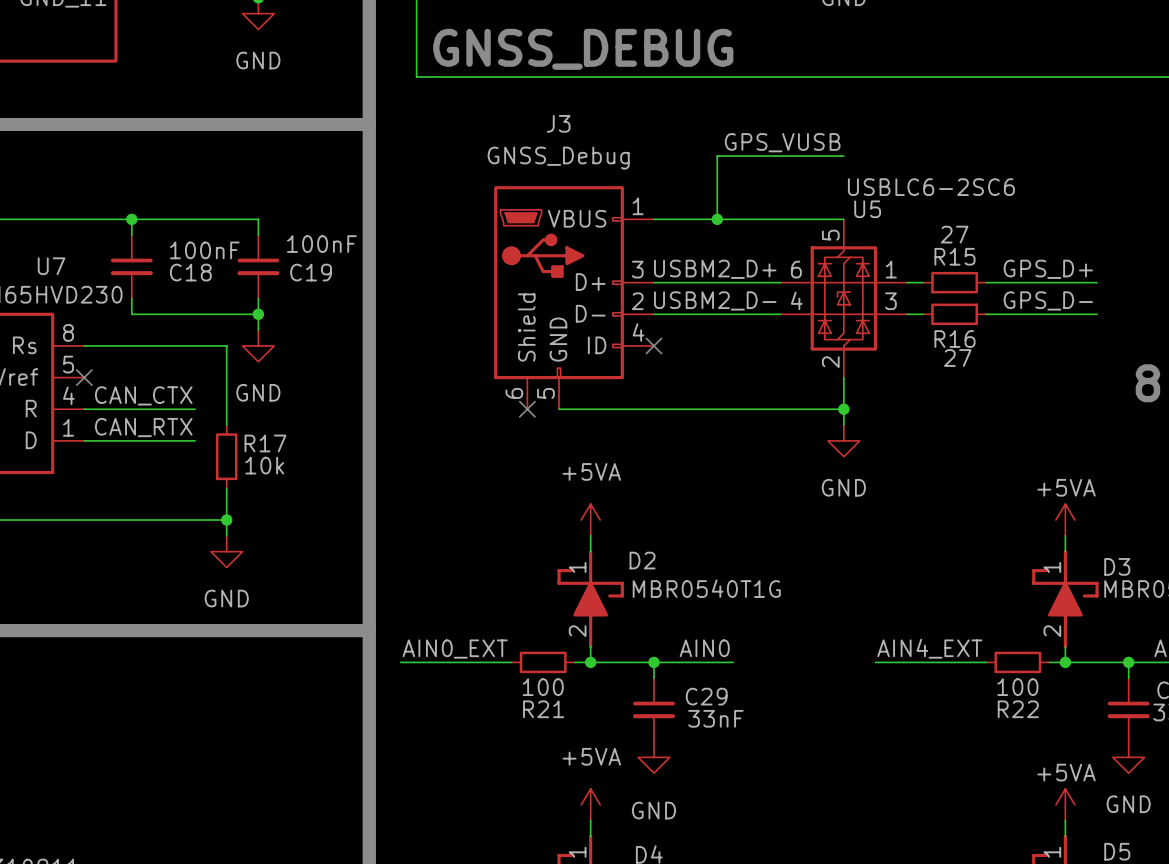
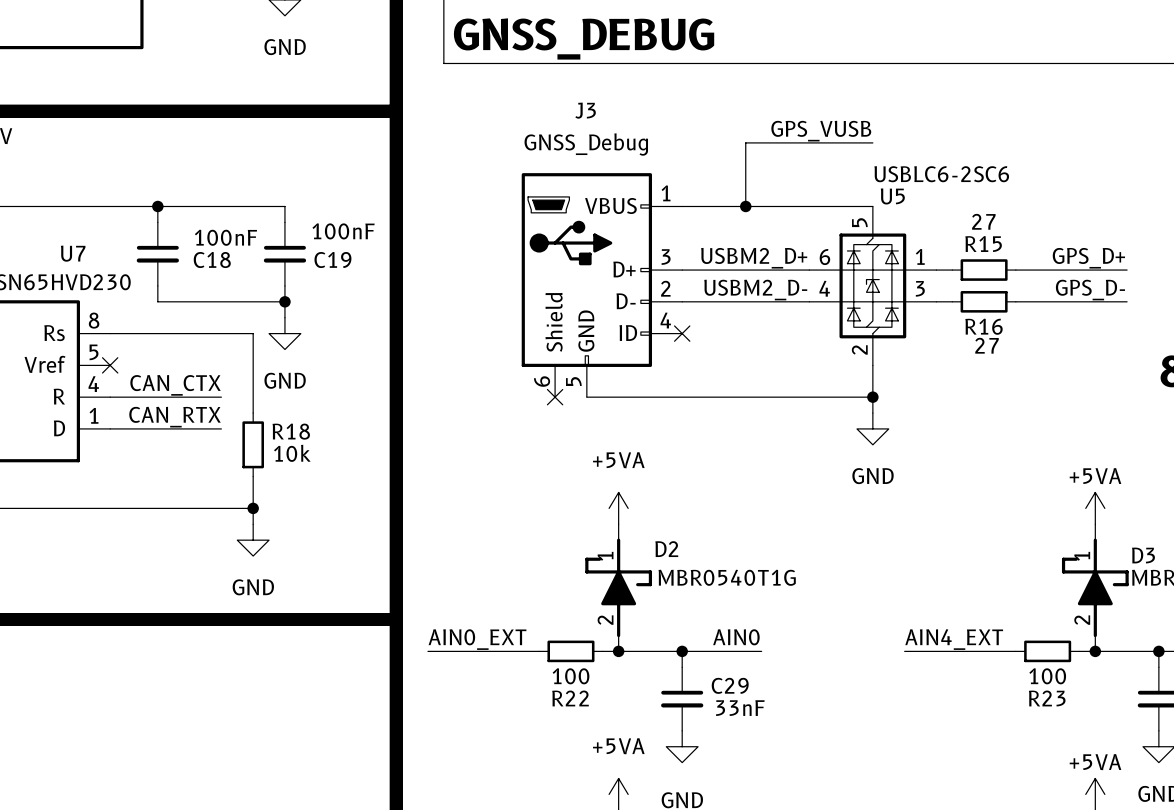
R17 name: R17 (265, 443) -> R18 (291, 431)
R21 name: R21 (543, 709) -> R22 (570, 698)
R22 name: R22 (1018, 709) -> R23 (1047, 698)

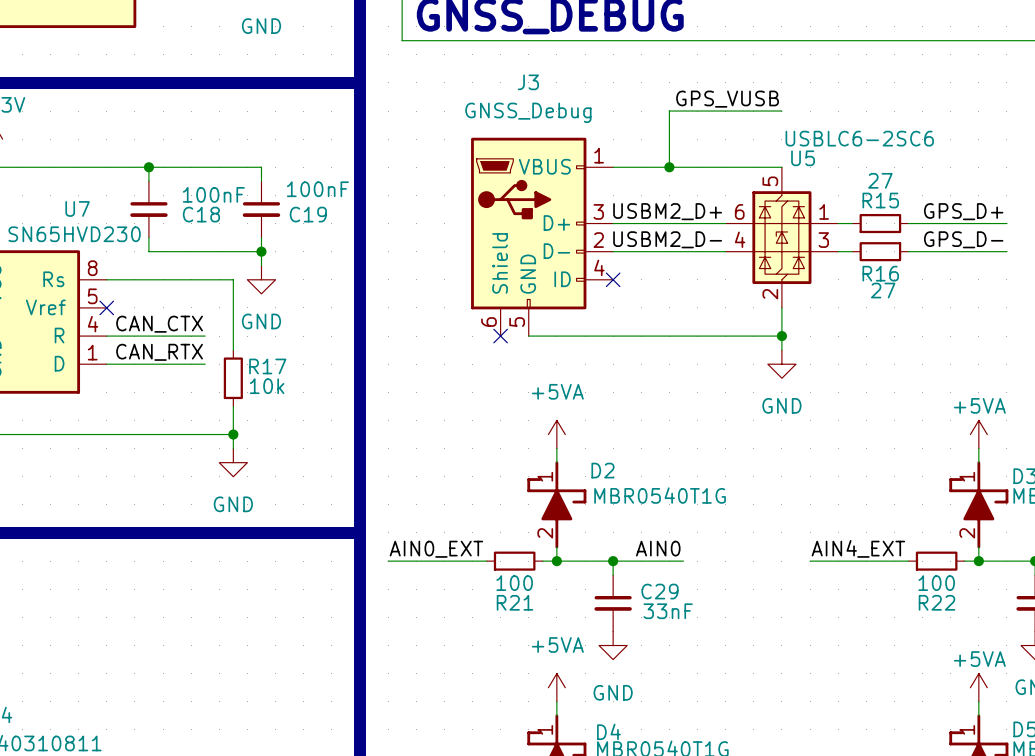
R18 name: R18 (291, 431) -> R17 (267, 366)
R22 name: R22 (570, 698) -> R21 (515, 602)
R23 name: R23 (1047, 698) -> R22 (936, 602)

